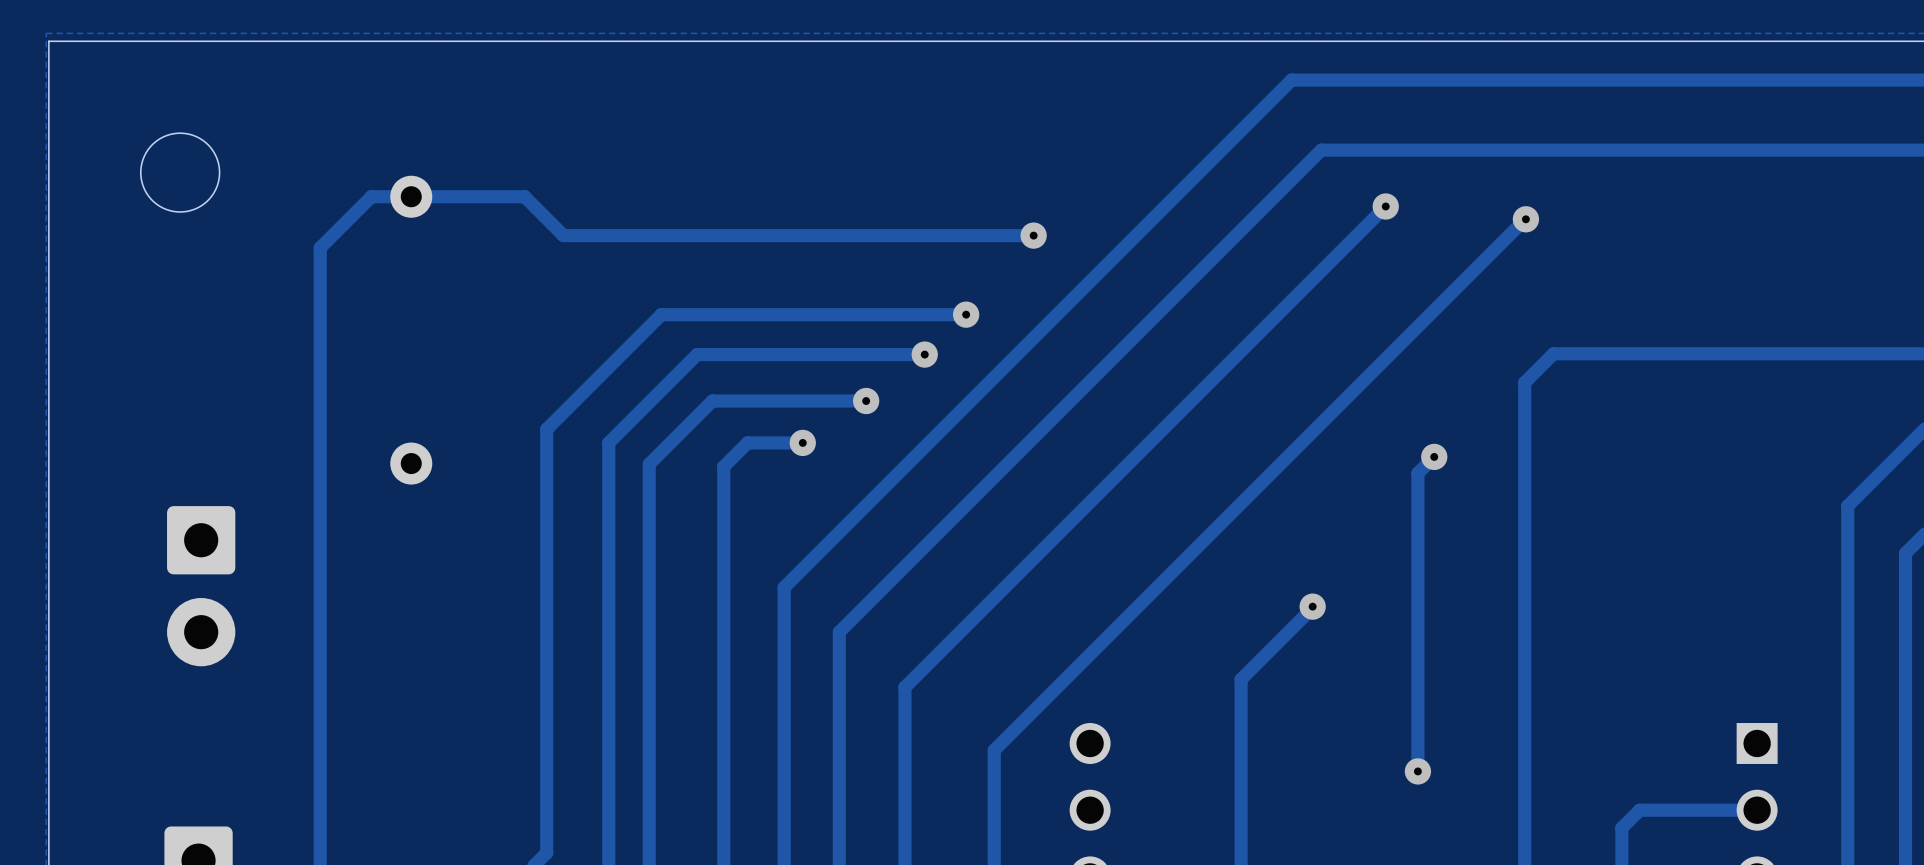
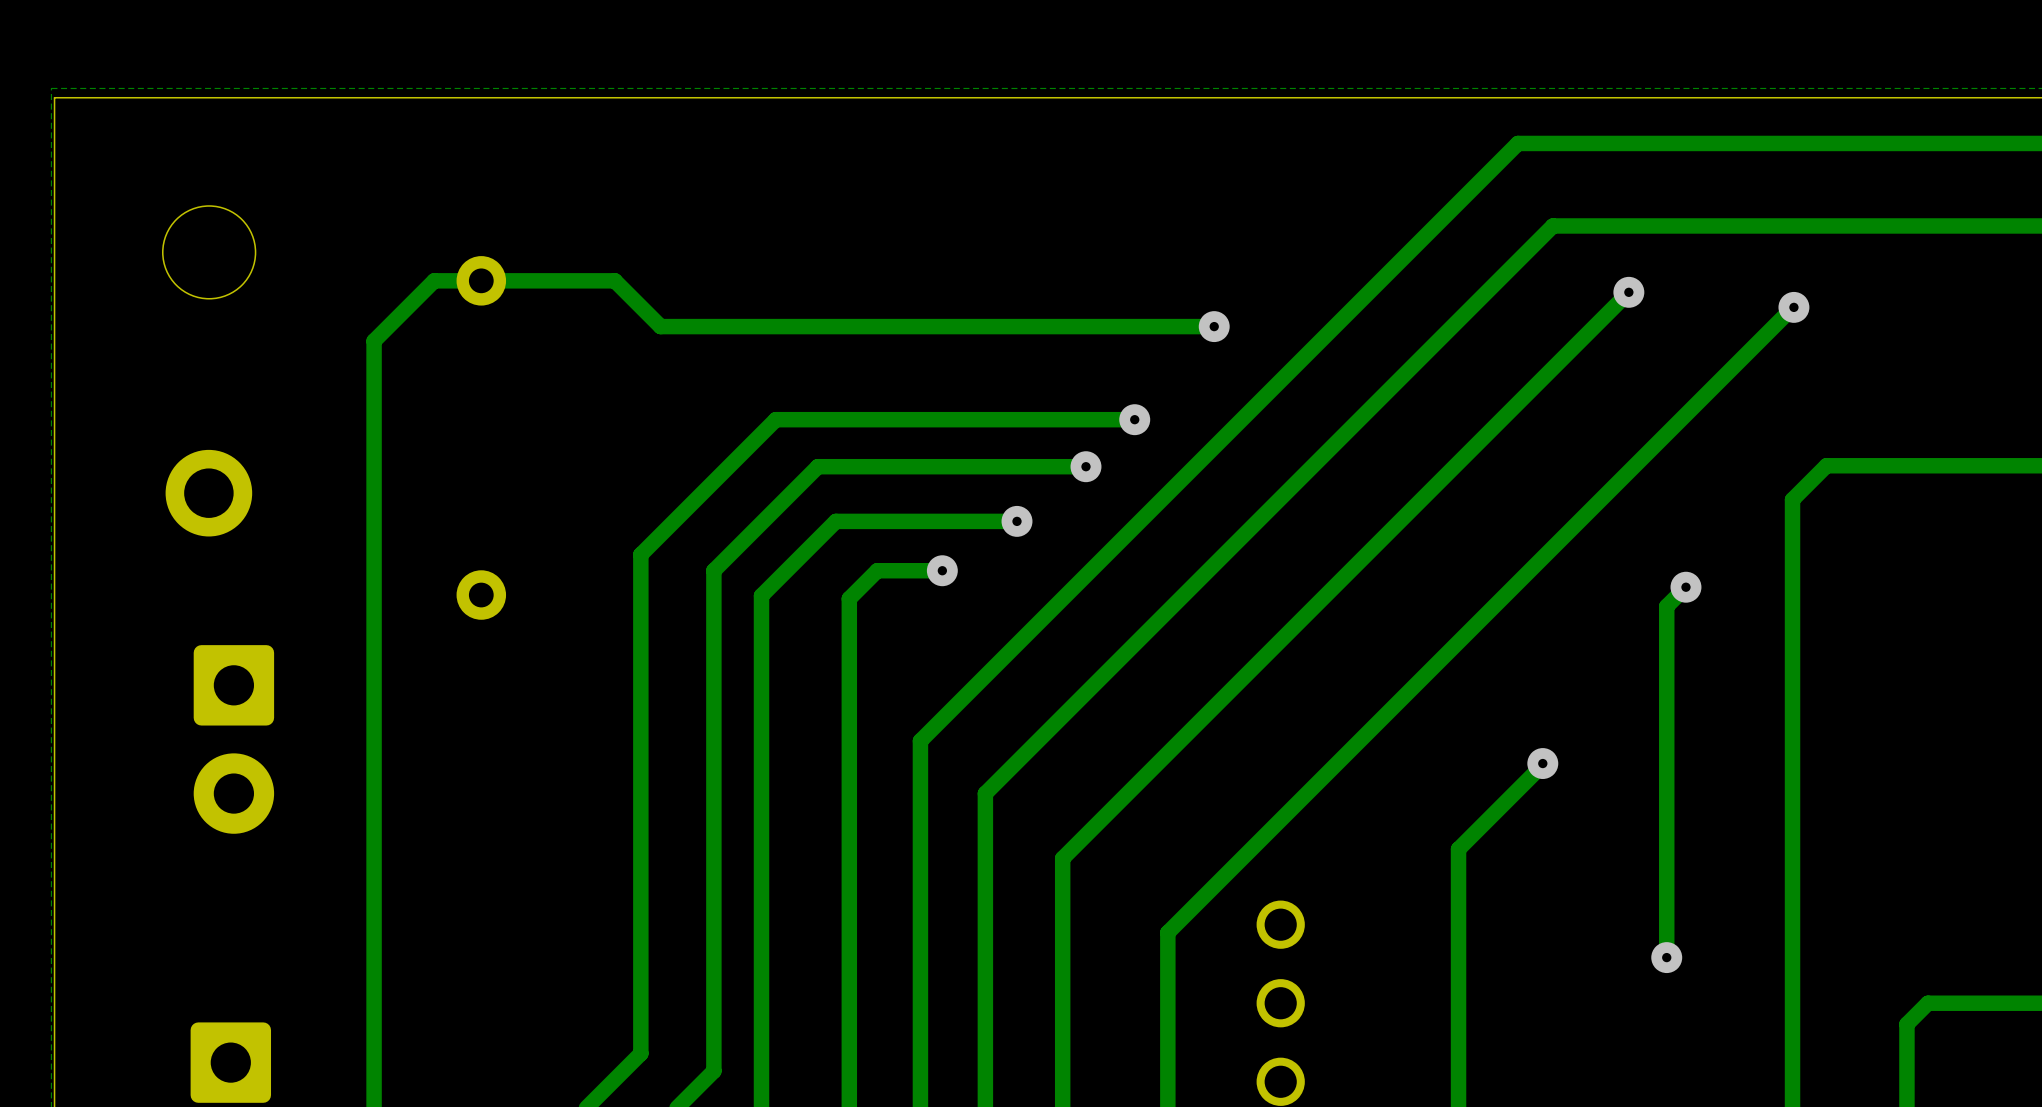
part: none -> (208, 493)

